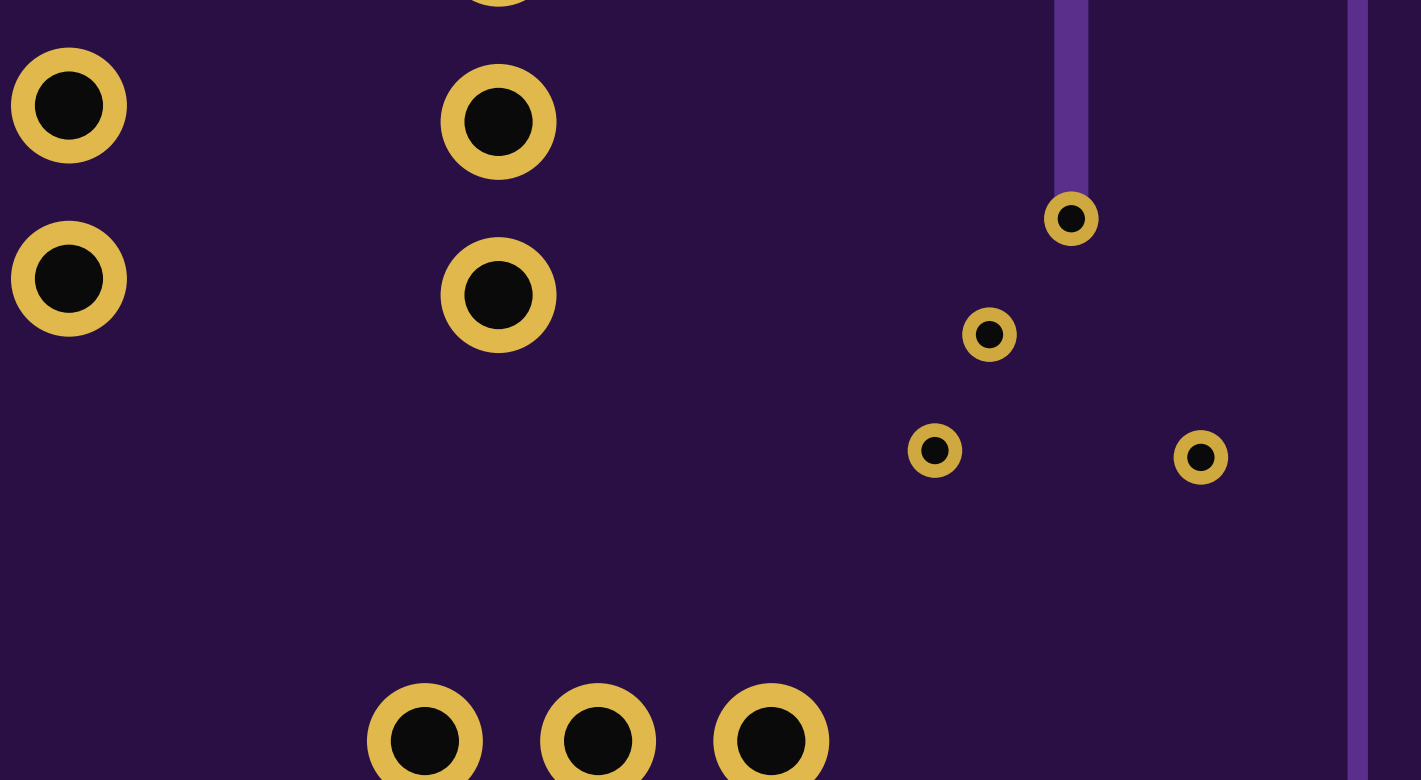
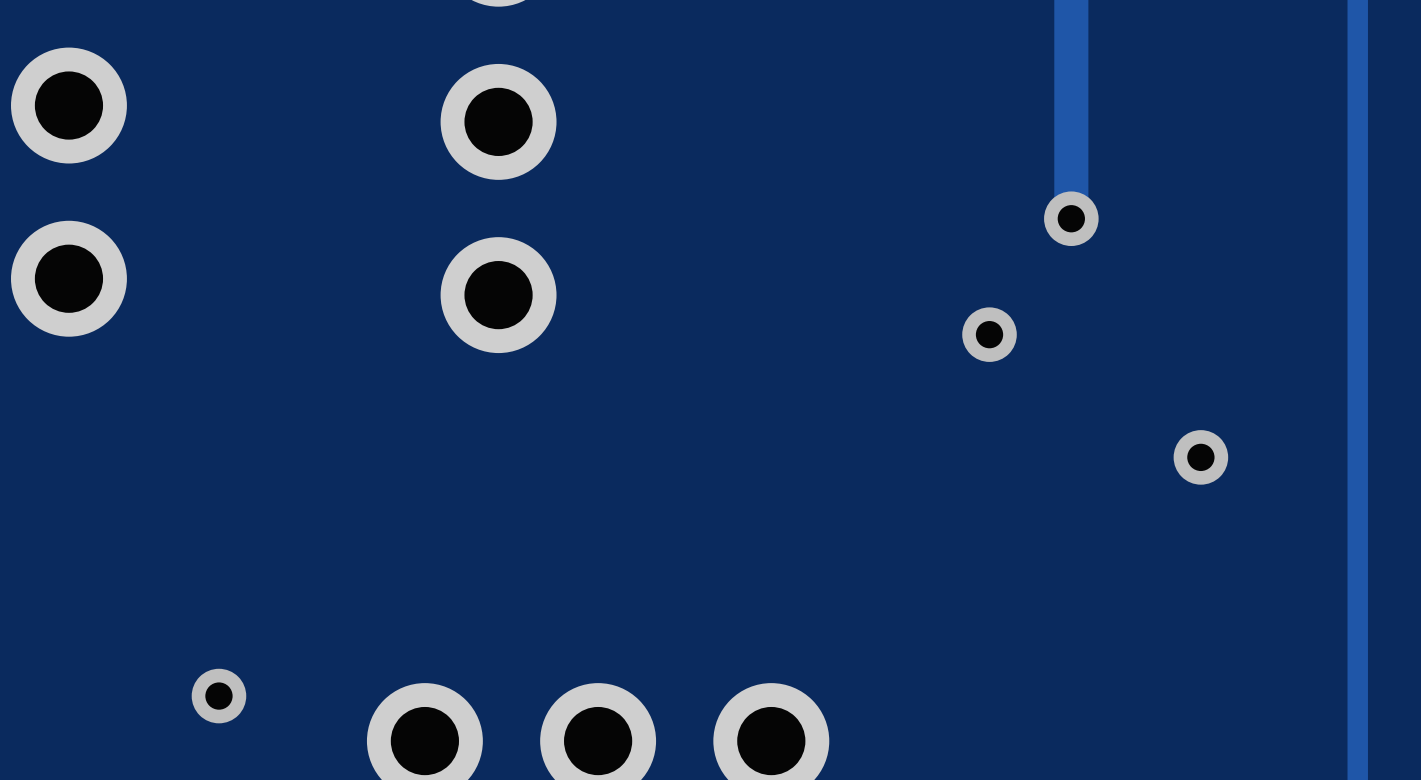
via: (934, 450) -> none
via: none -> (218, 696)

